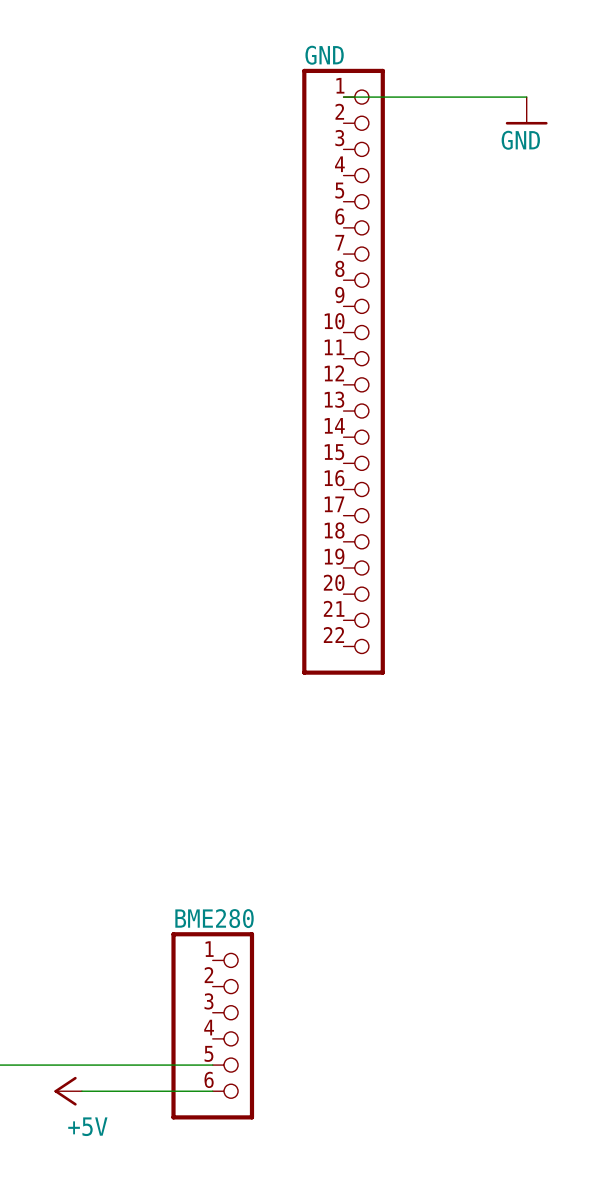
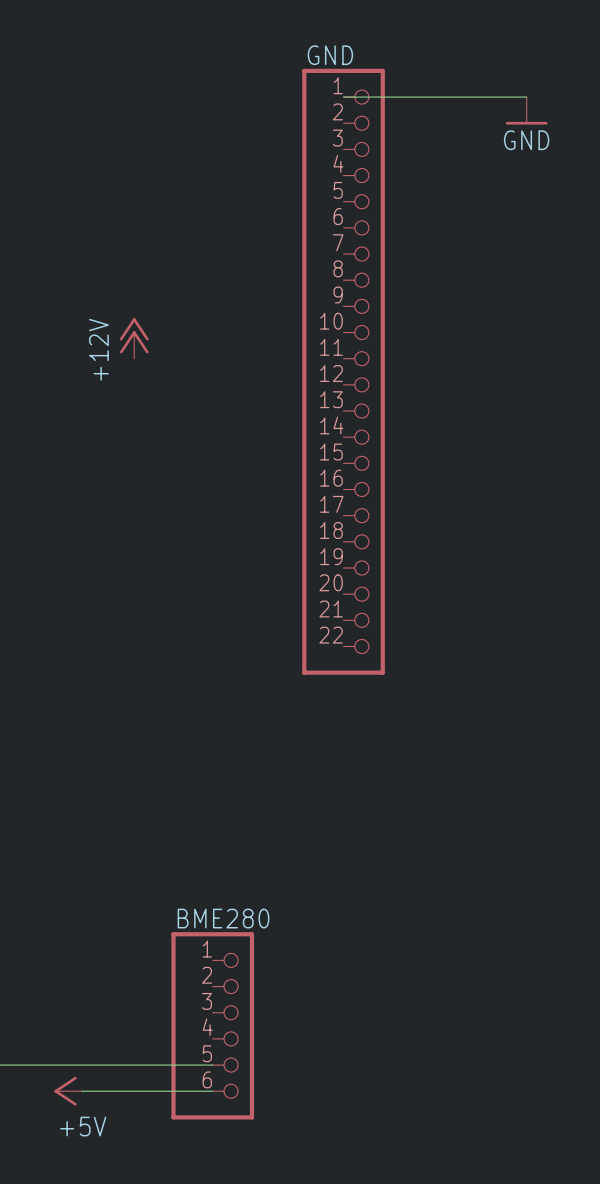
power symbol: none -> +12V (134, 338)

